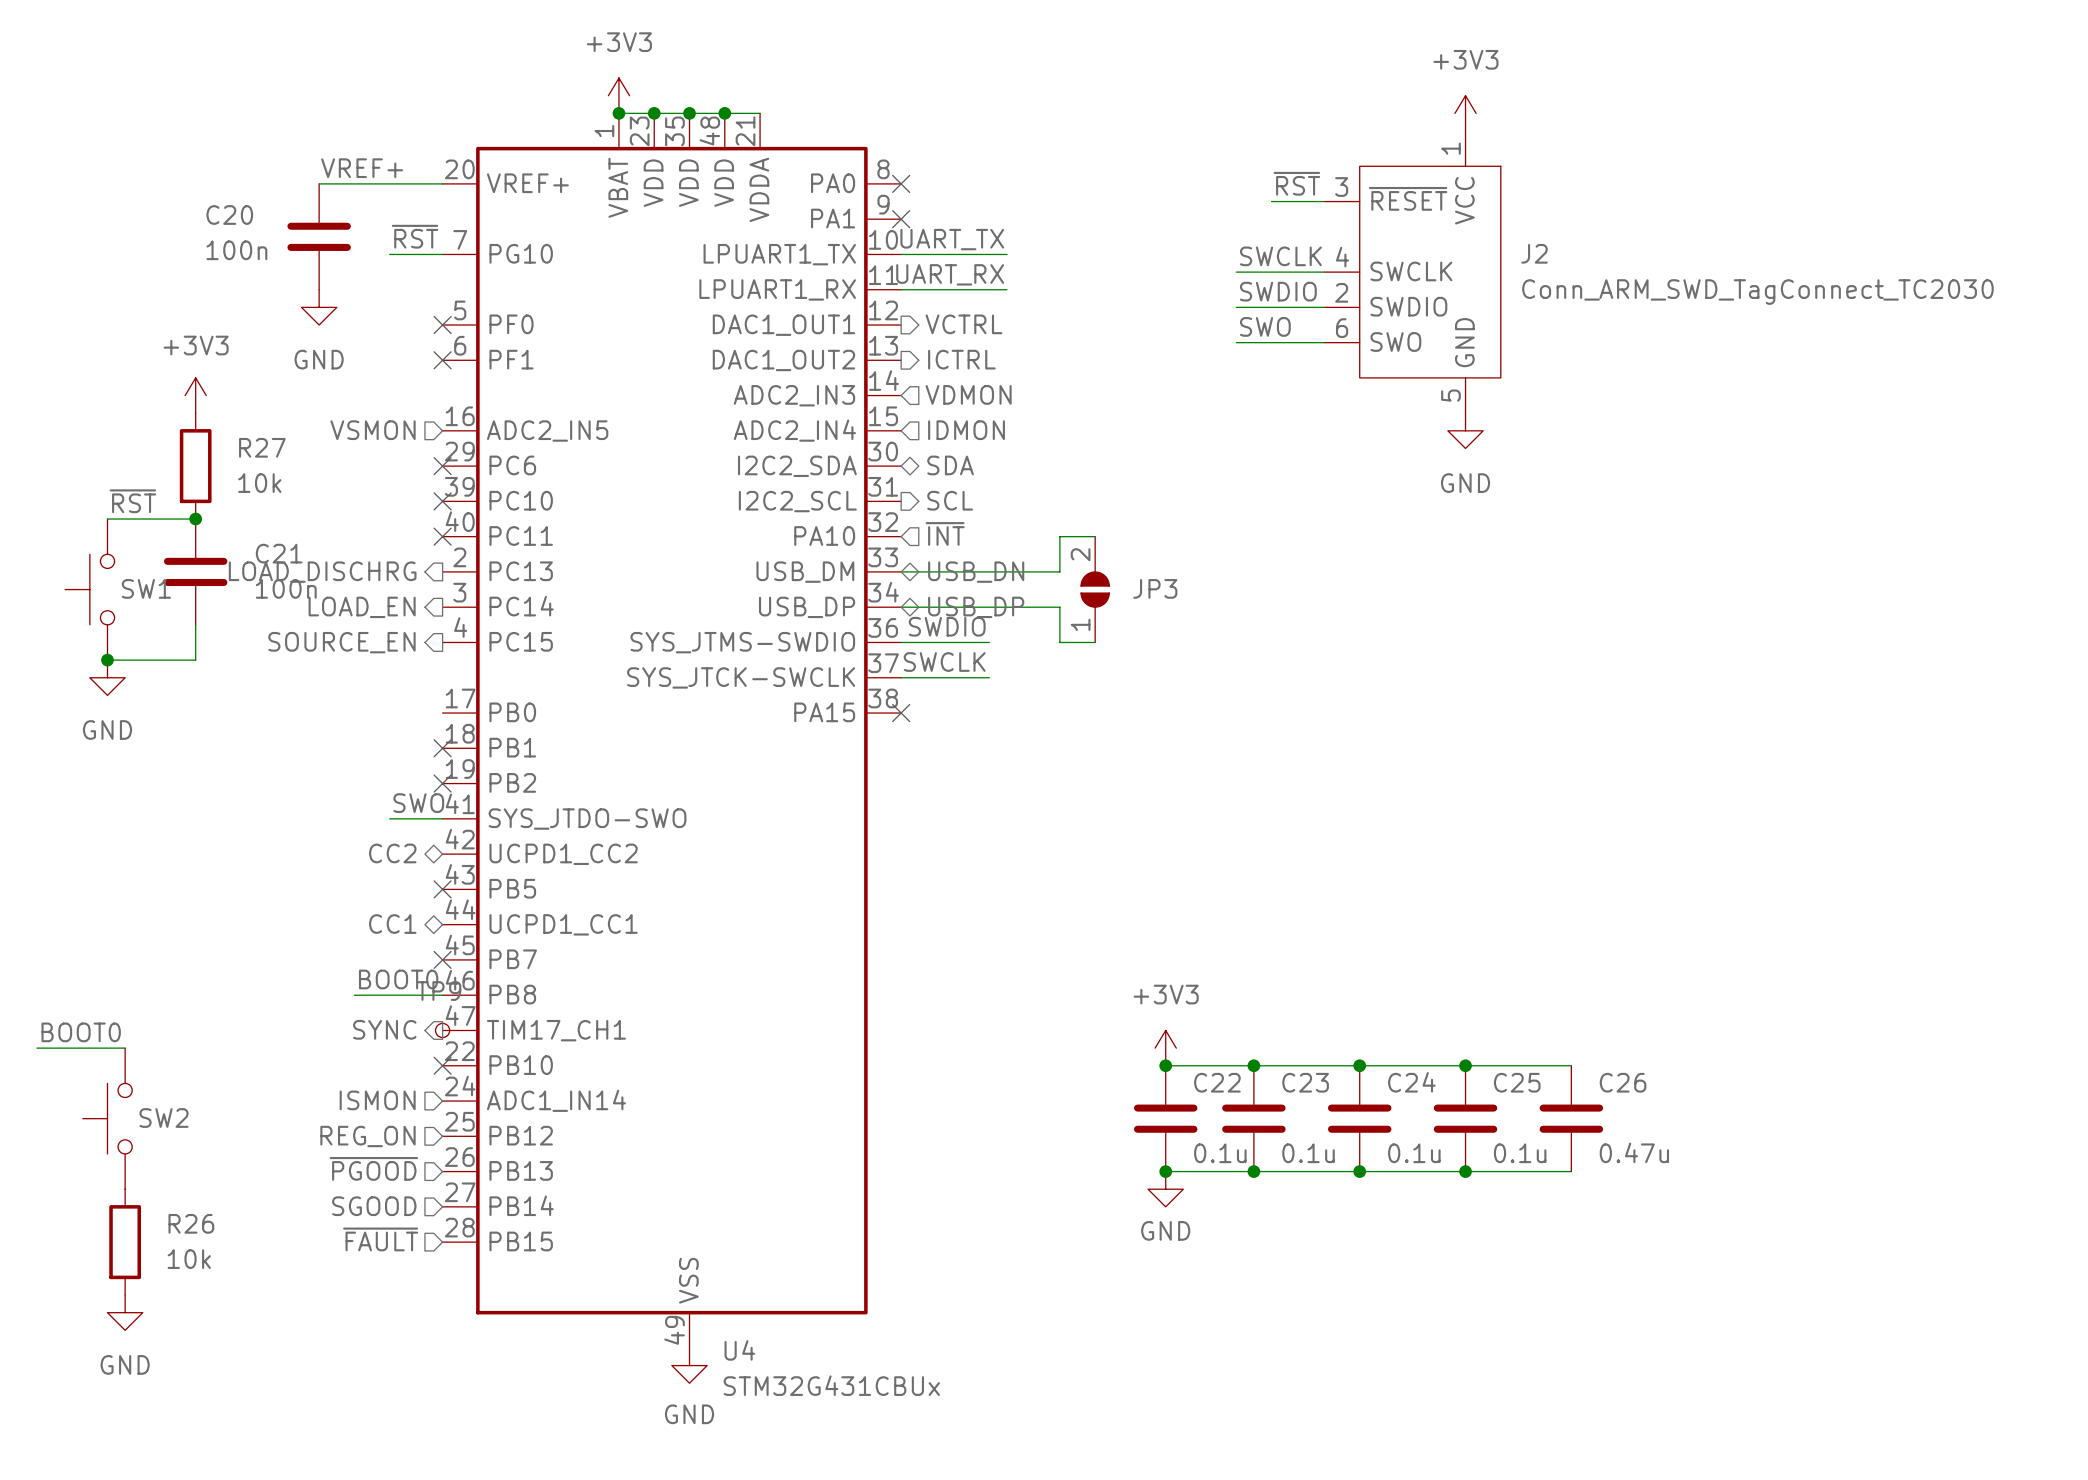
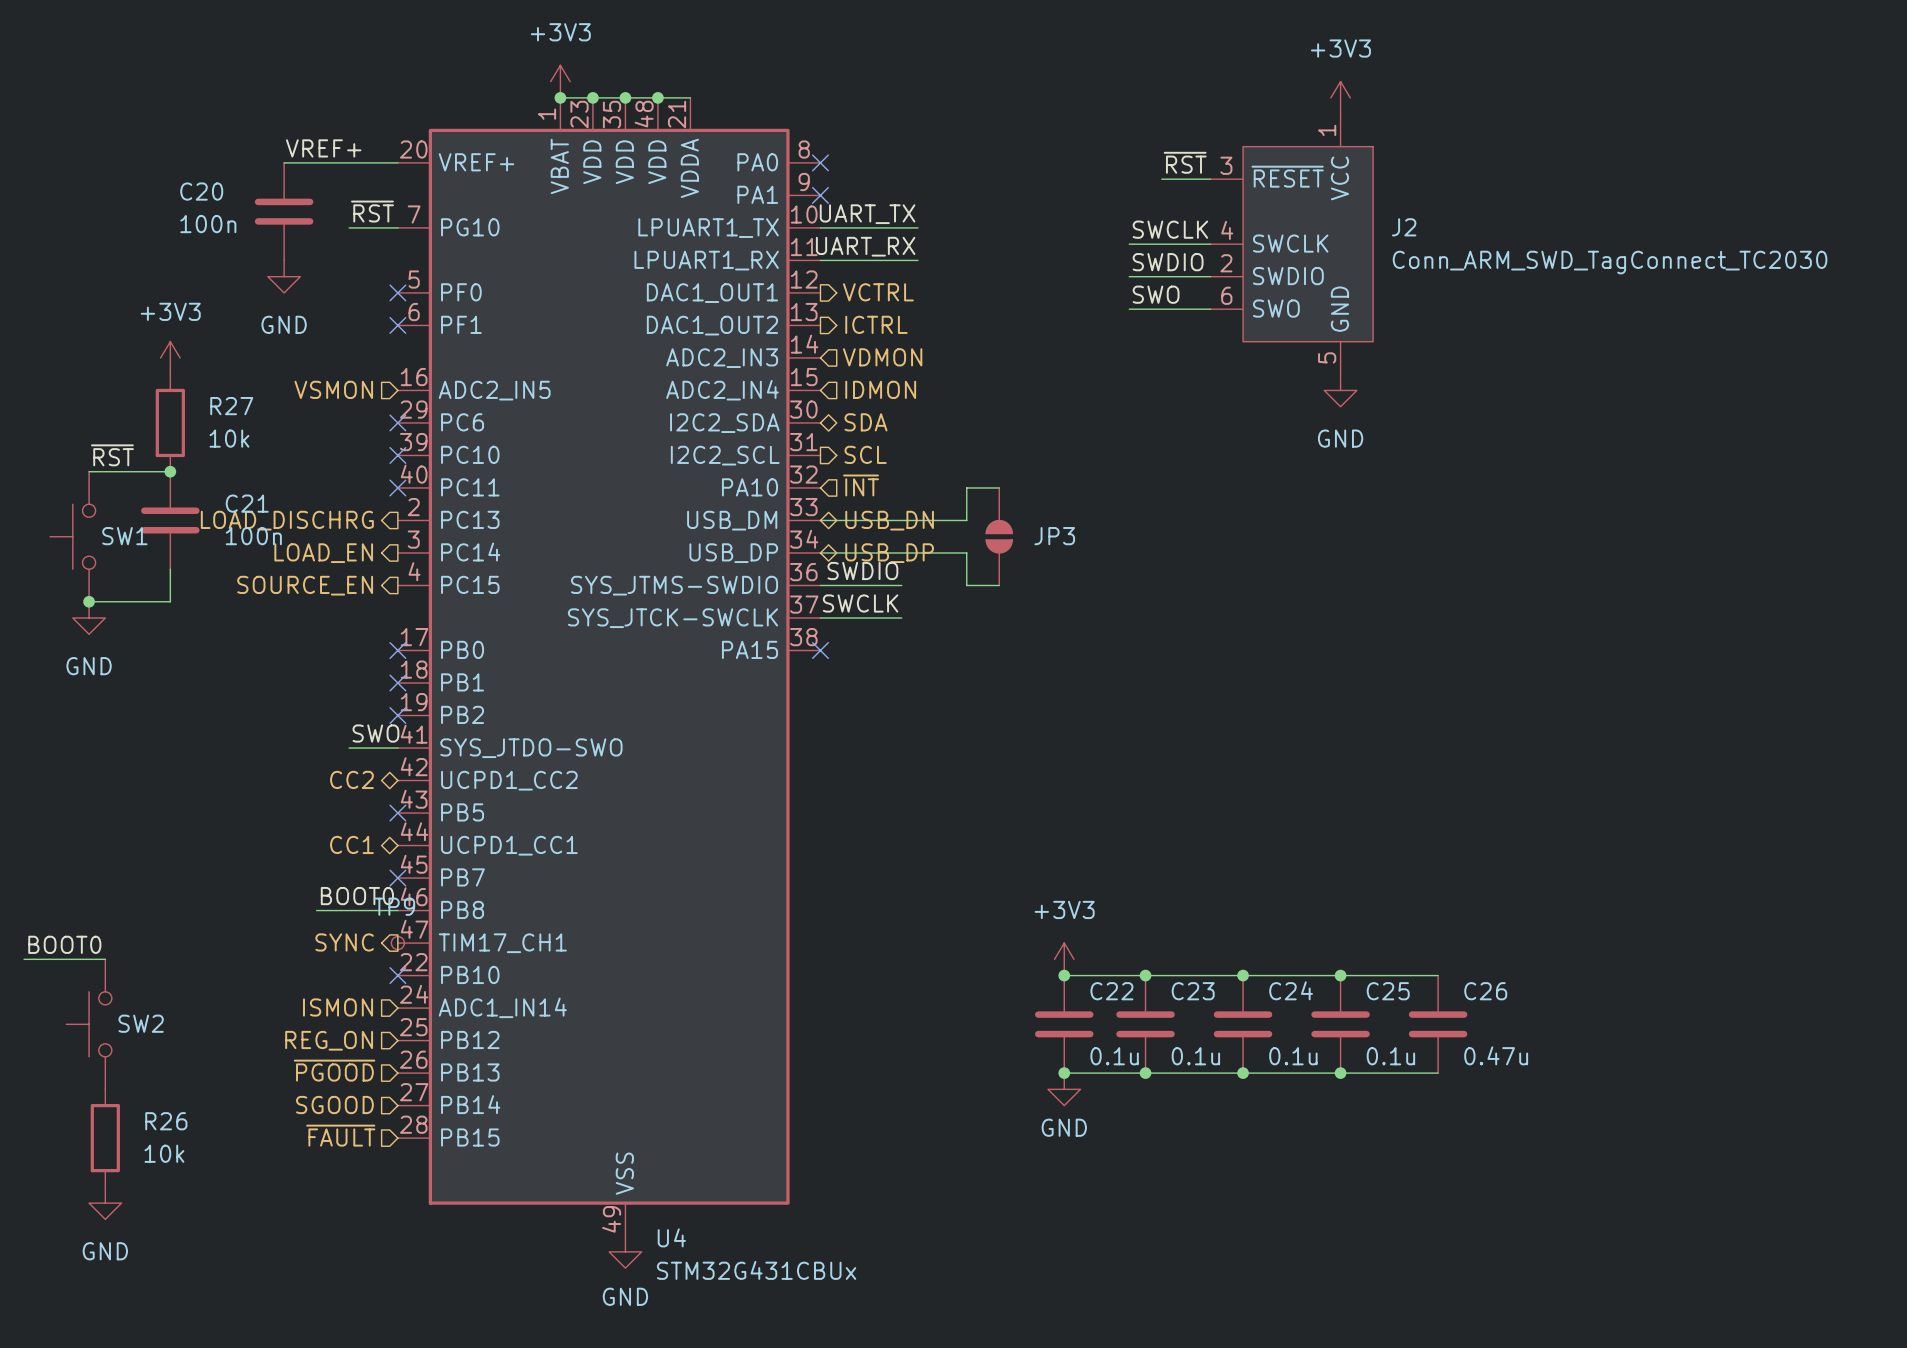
JP3 pin number: 2 (1080, 554) -> none
JP3 pin number: 1 (1080, 624) -> none
no-connect mark: none -> (397, 650)

